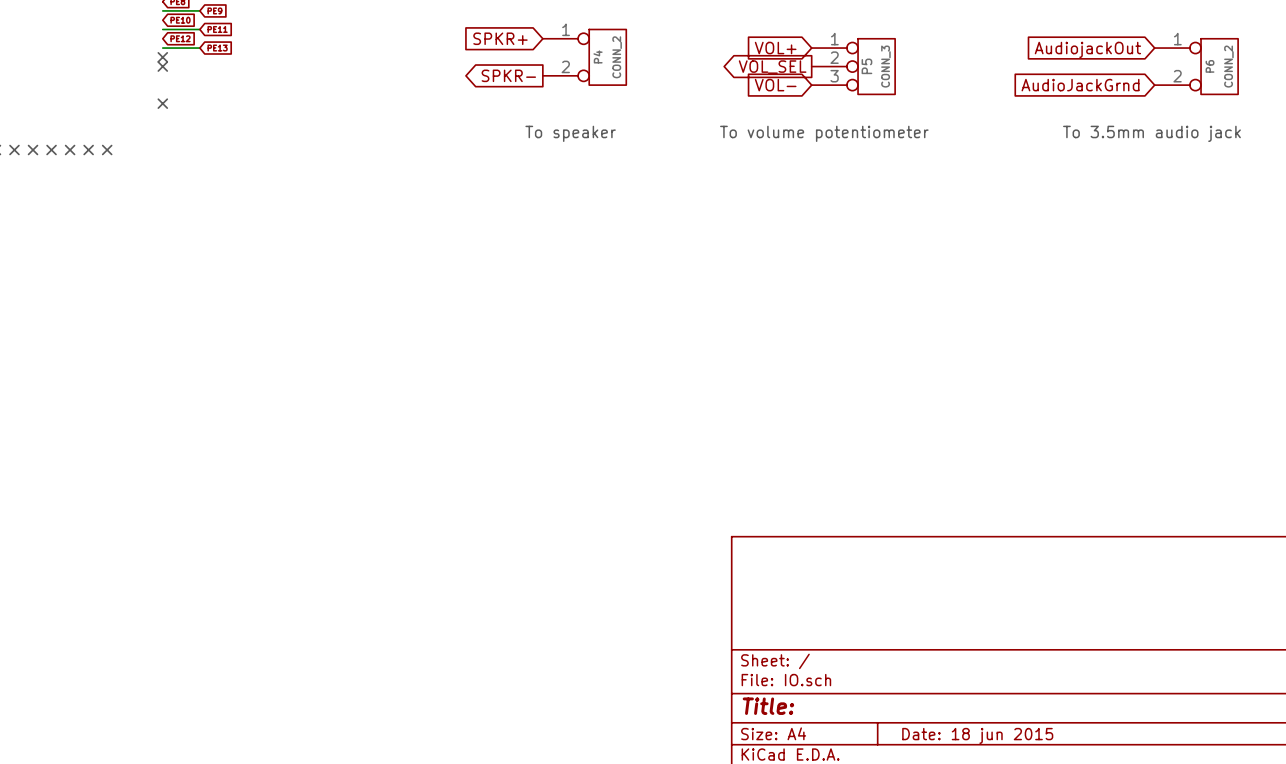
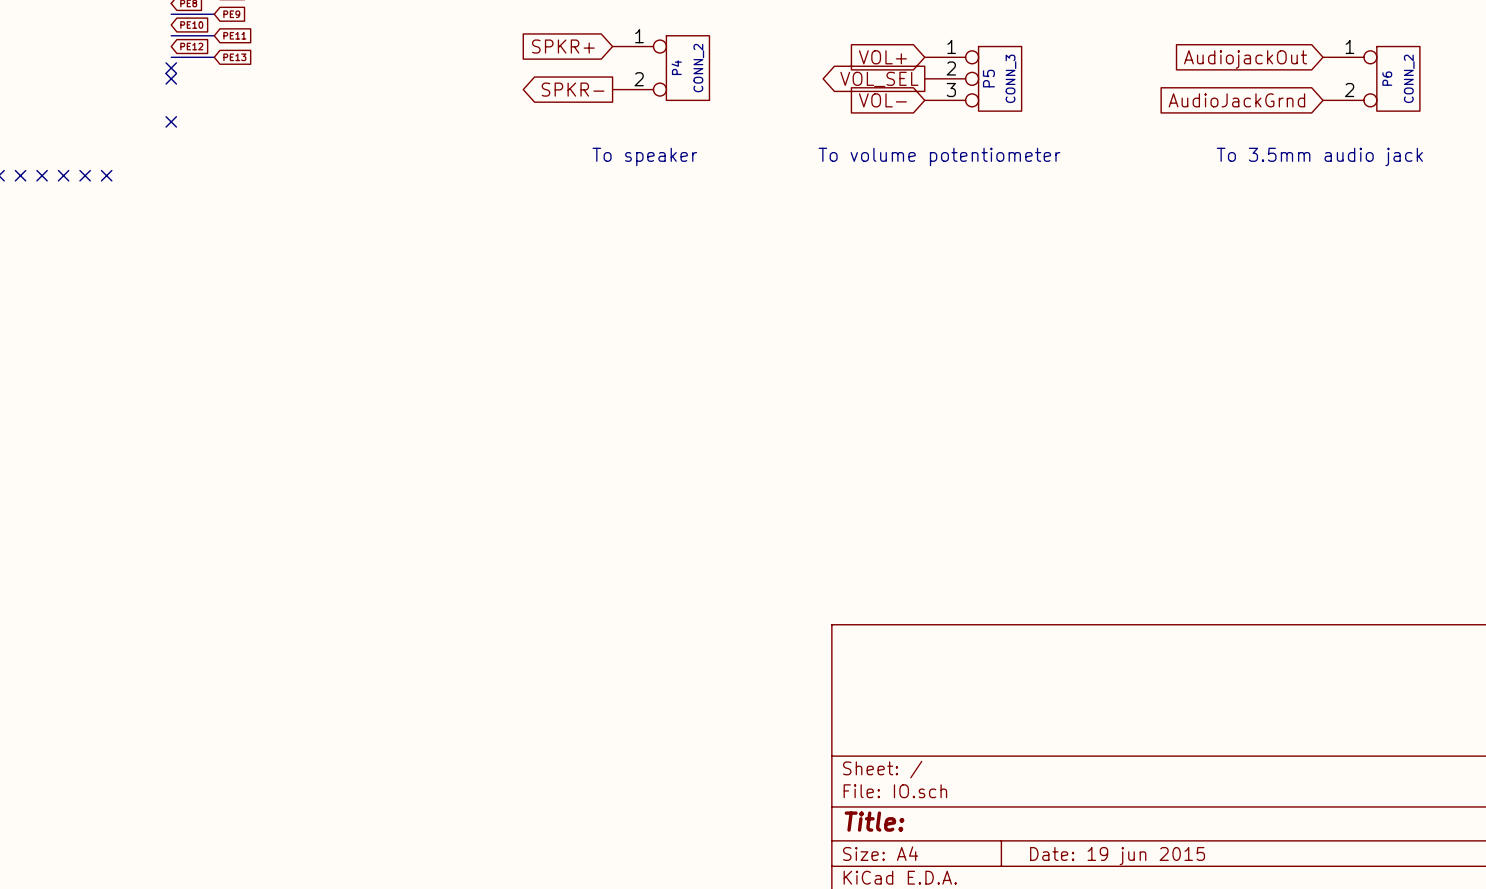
title block: Date: 18 jun 2015 (977, 735) -> Date: 19 jun 2015 (1117, 856)

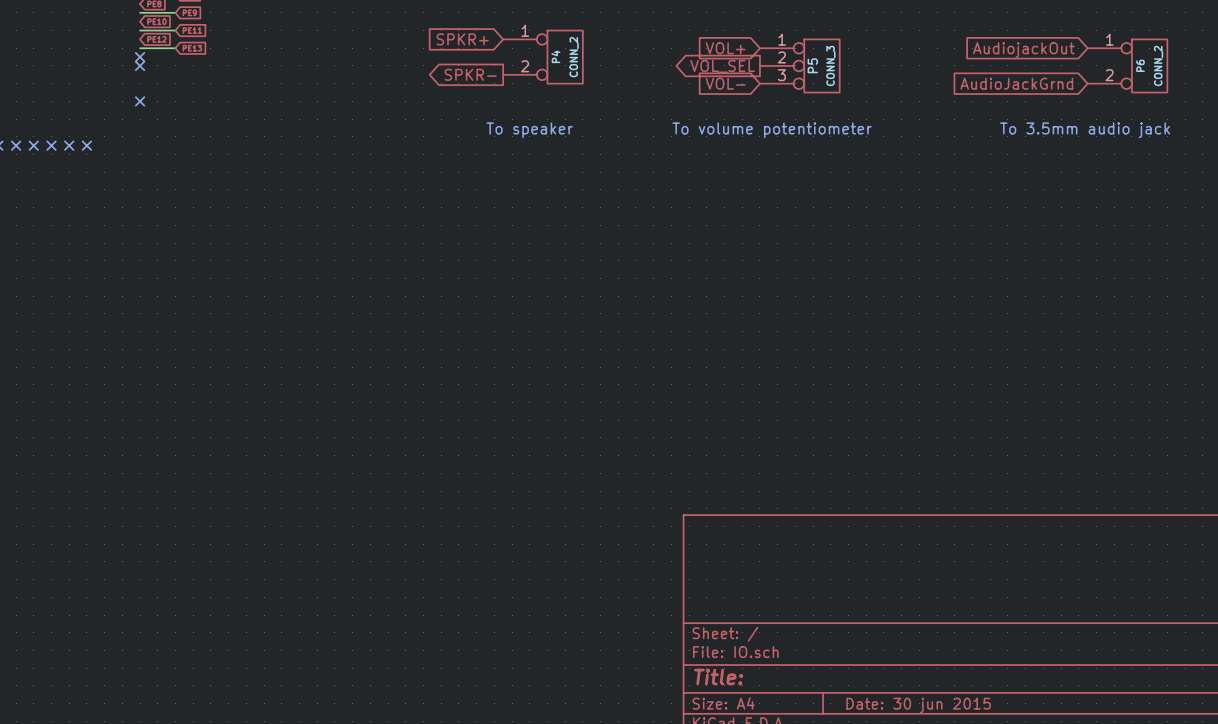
title block: Date: 19 jun 2015 (1117, 856) -> Date: 30 jun 2015 (918, 705)

